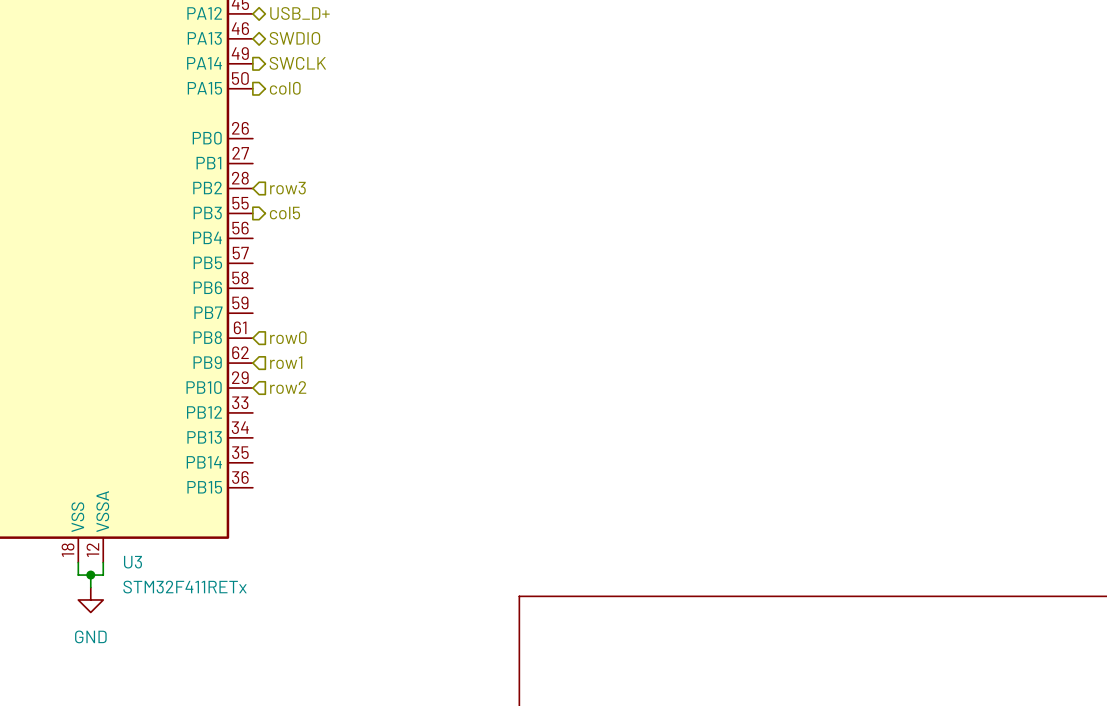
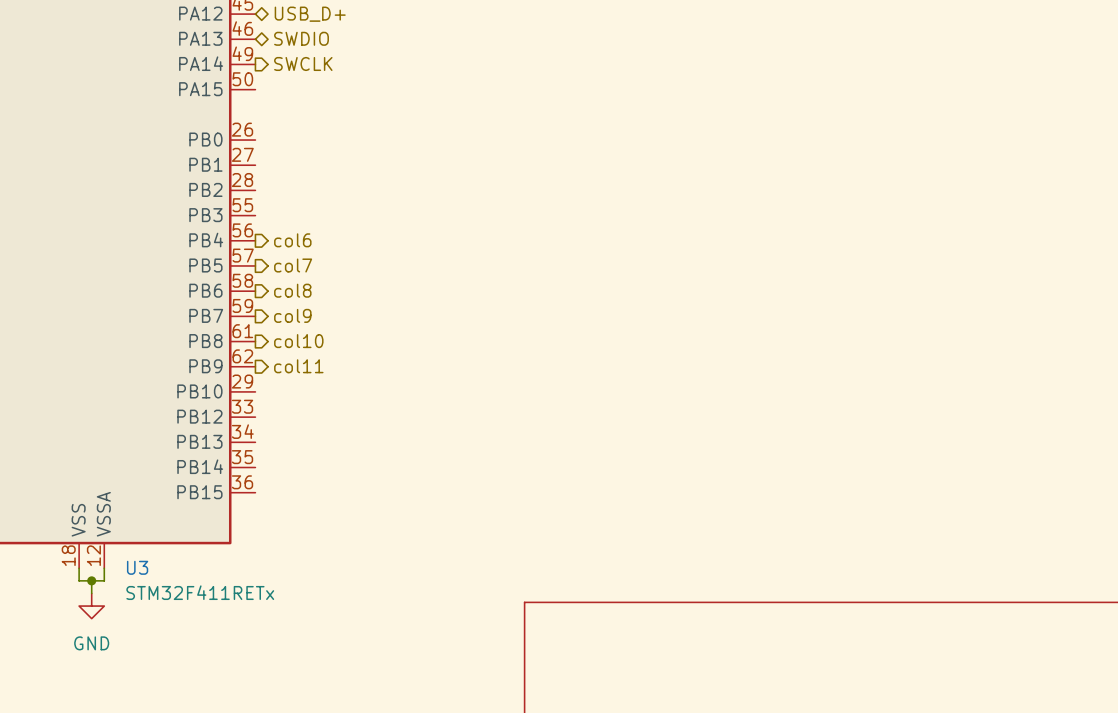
hierarchical label: col0 (285, 88) -> none
hierarchical label: row3 (287, 188) -> none
hierarchical label: col5 (284, 213) -> col6 (292, 240)
hierarchical label: none -> col7 (293, 265)
hierarchical label: none -> col8 (292, 290)
hierarchical label: none -> col9 (292, 315)
hierarchical label shape: input (288, 337) -> output (298, 341)
hierarchical label: row0 (288, 337) -> col10 (298, 341)
hierarchical label shape: input (286, 362) -> output (298, 366)
hierarchical label: row1 (286, 362) -> col11 (298, 366)
hierarchical label: row2 (288, 387) -> none

